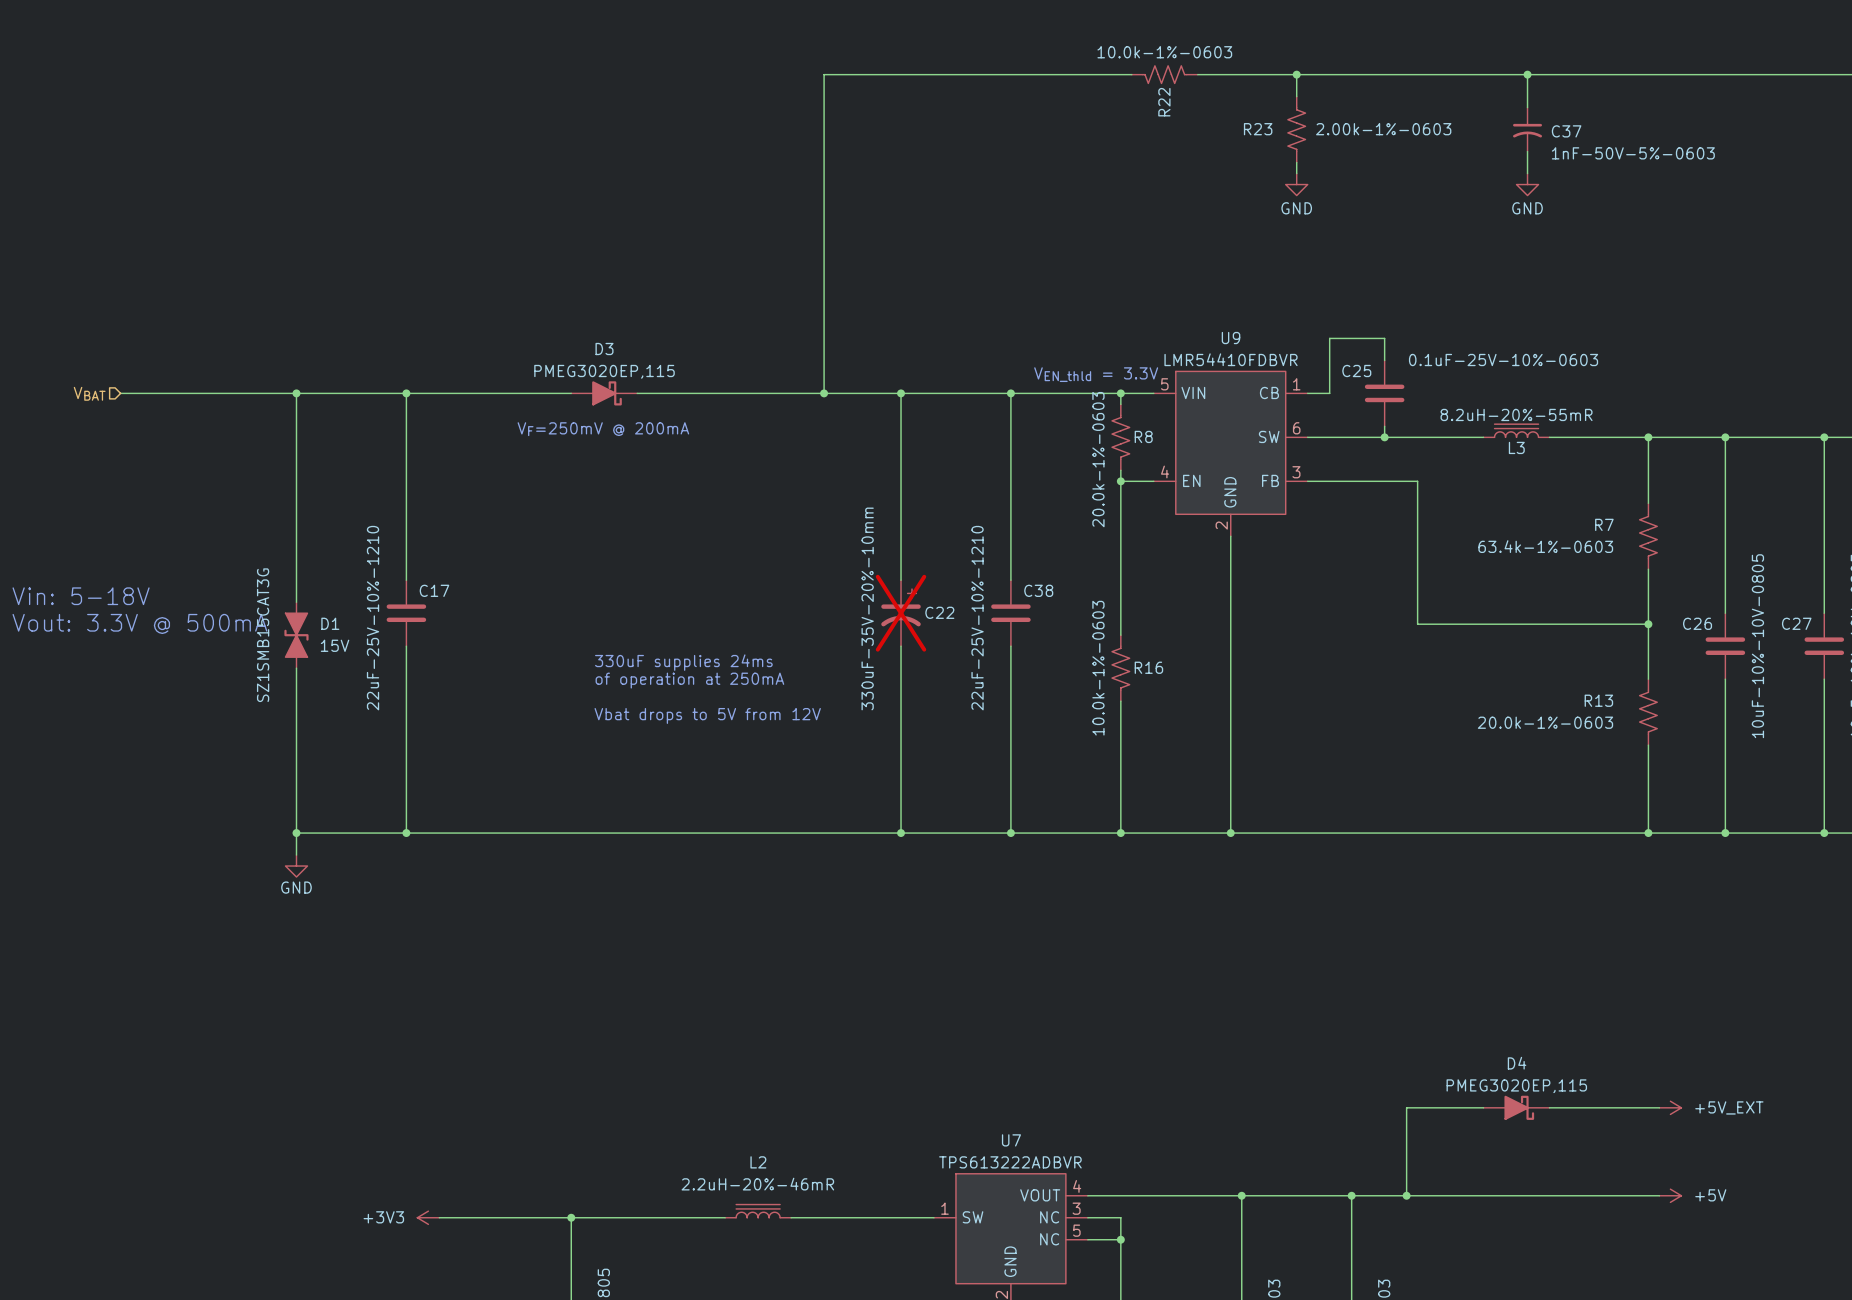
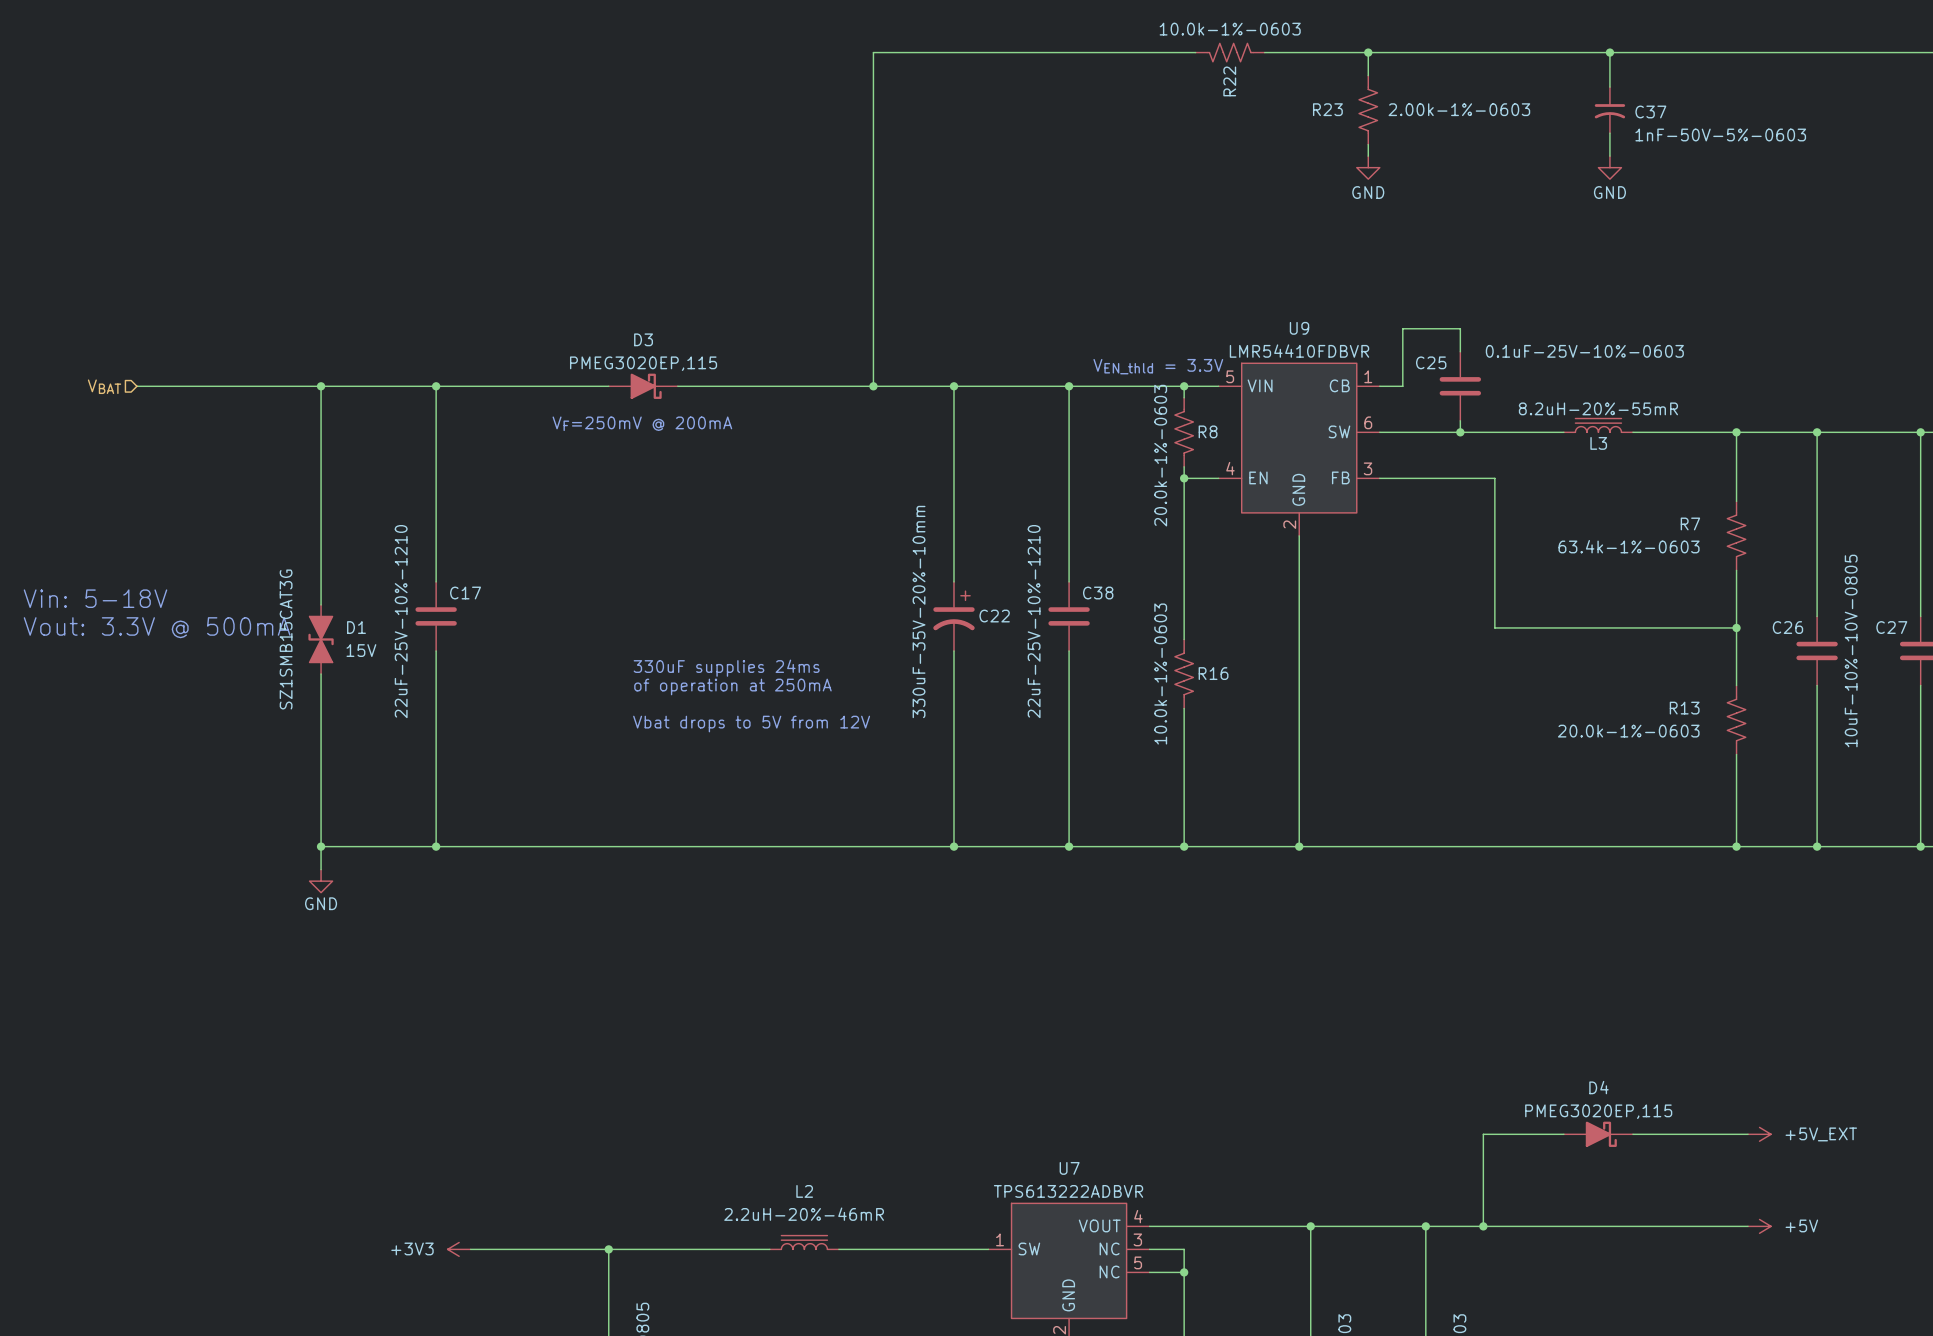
C22 do-not-place cross: (901, 613) -> none

